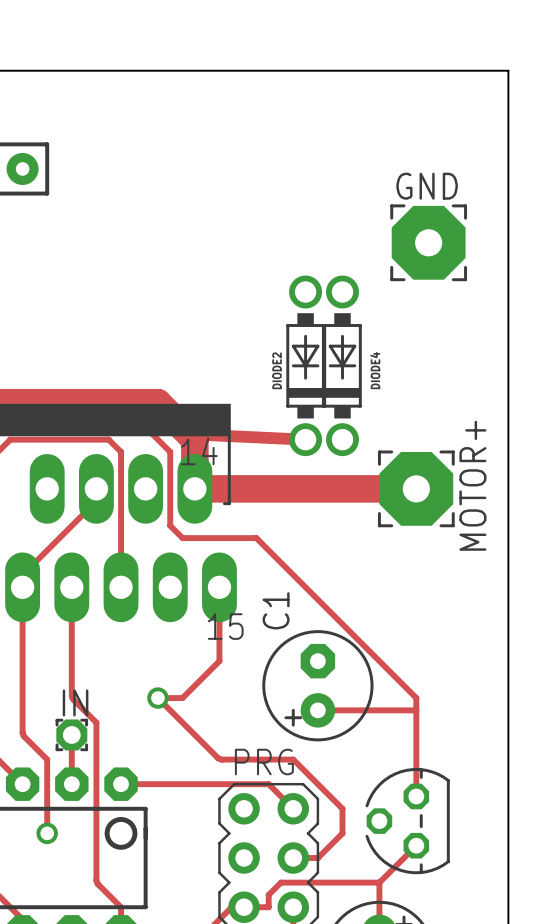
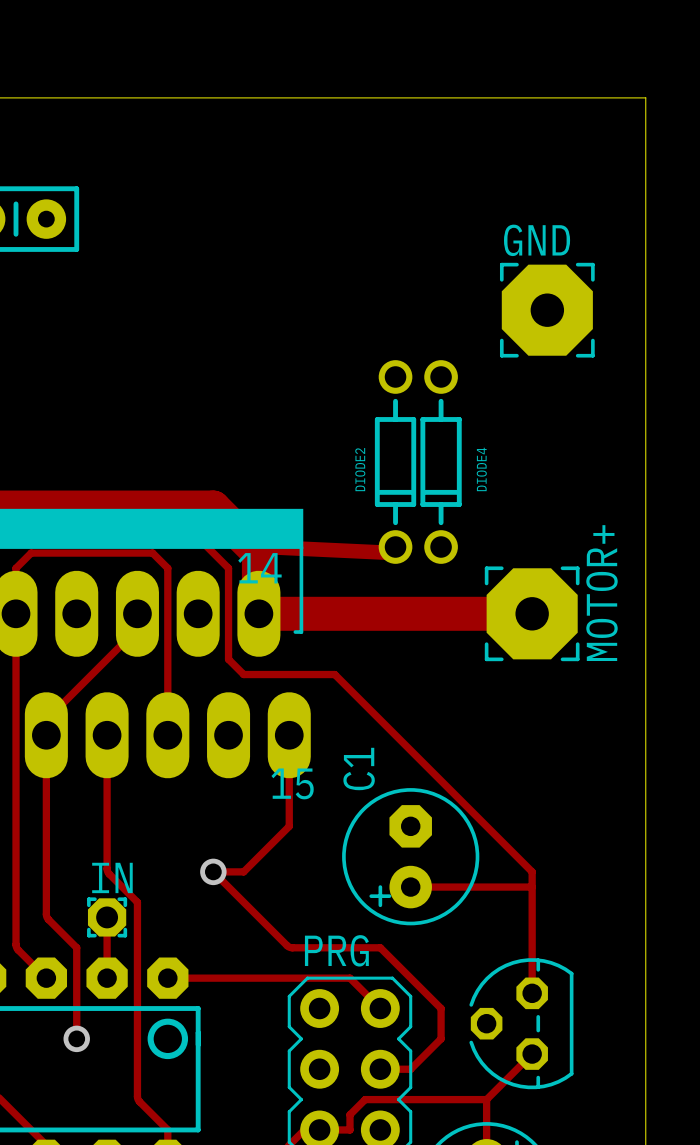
DIODE2 footprint: [286, 275, 325, 457] -> [374, 360, 417, 564]
DIODE4 footprint: [323, 275, 362, 457] -> [420, 360, 462, 564]

